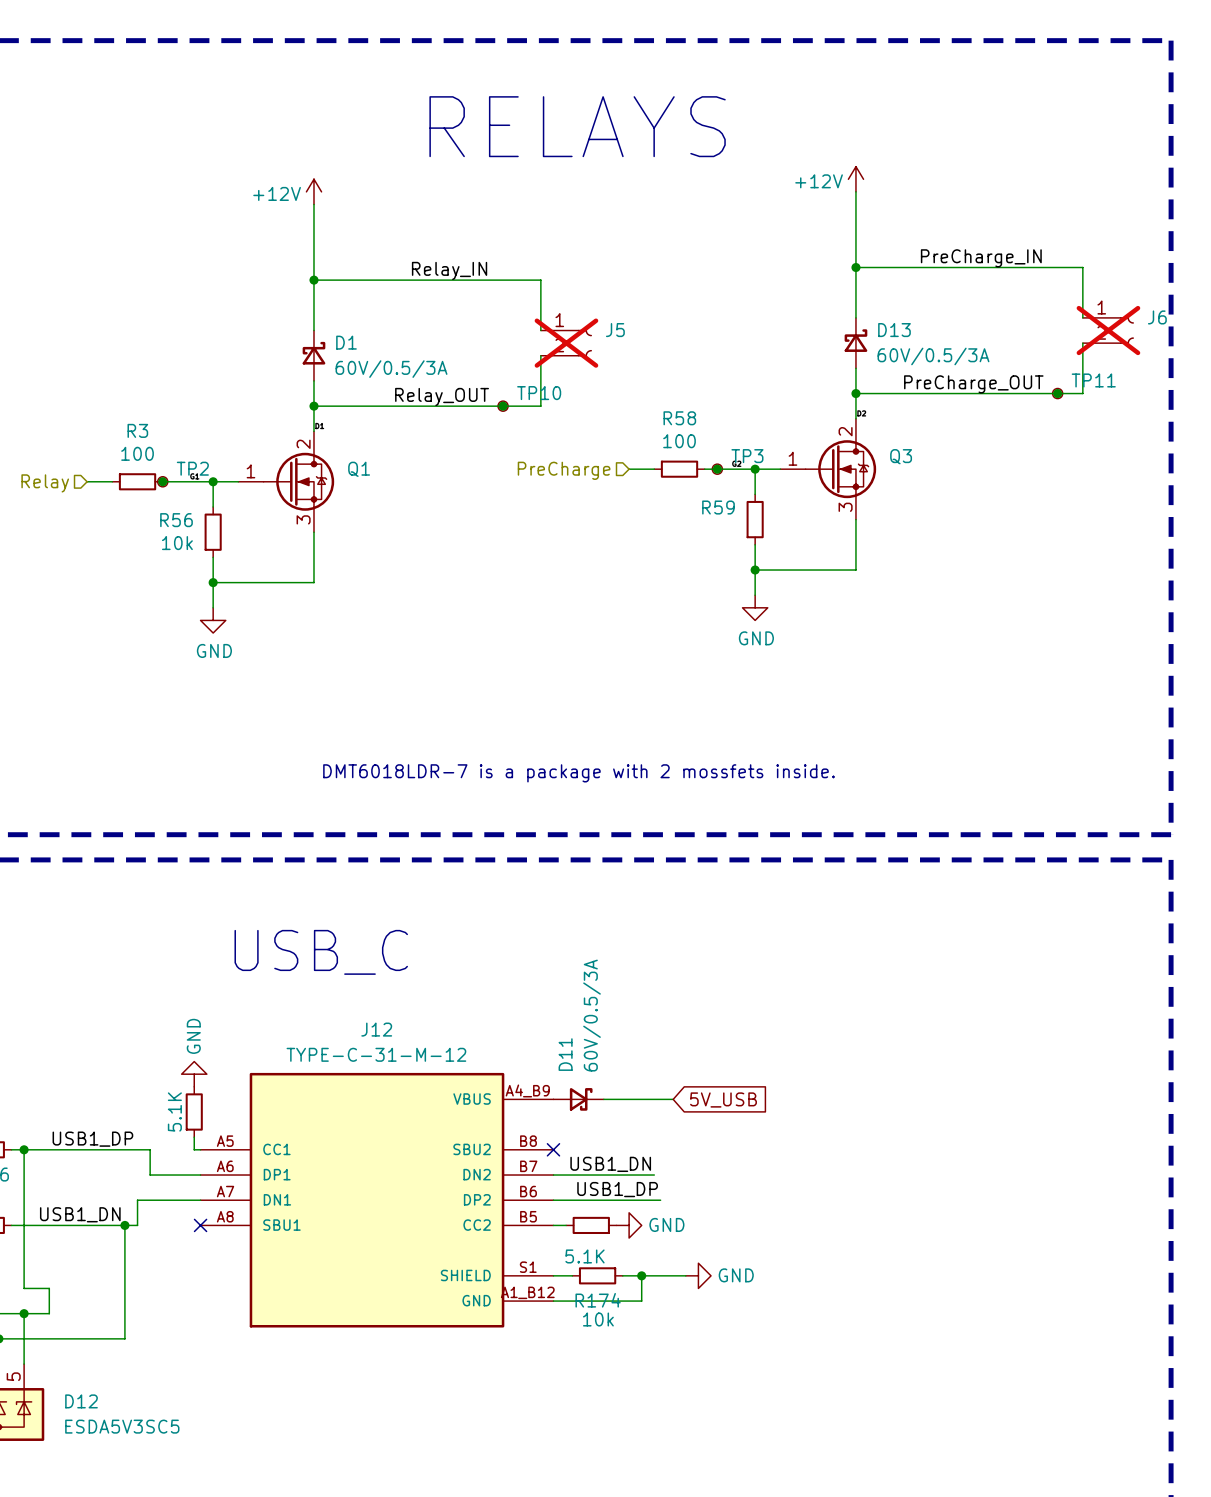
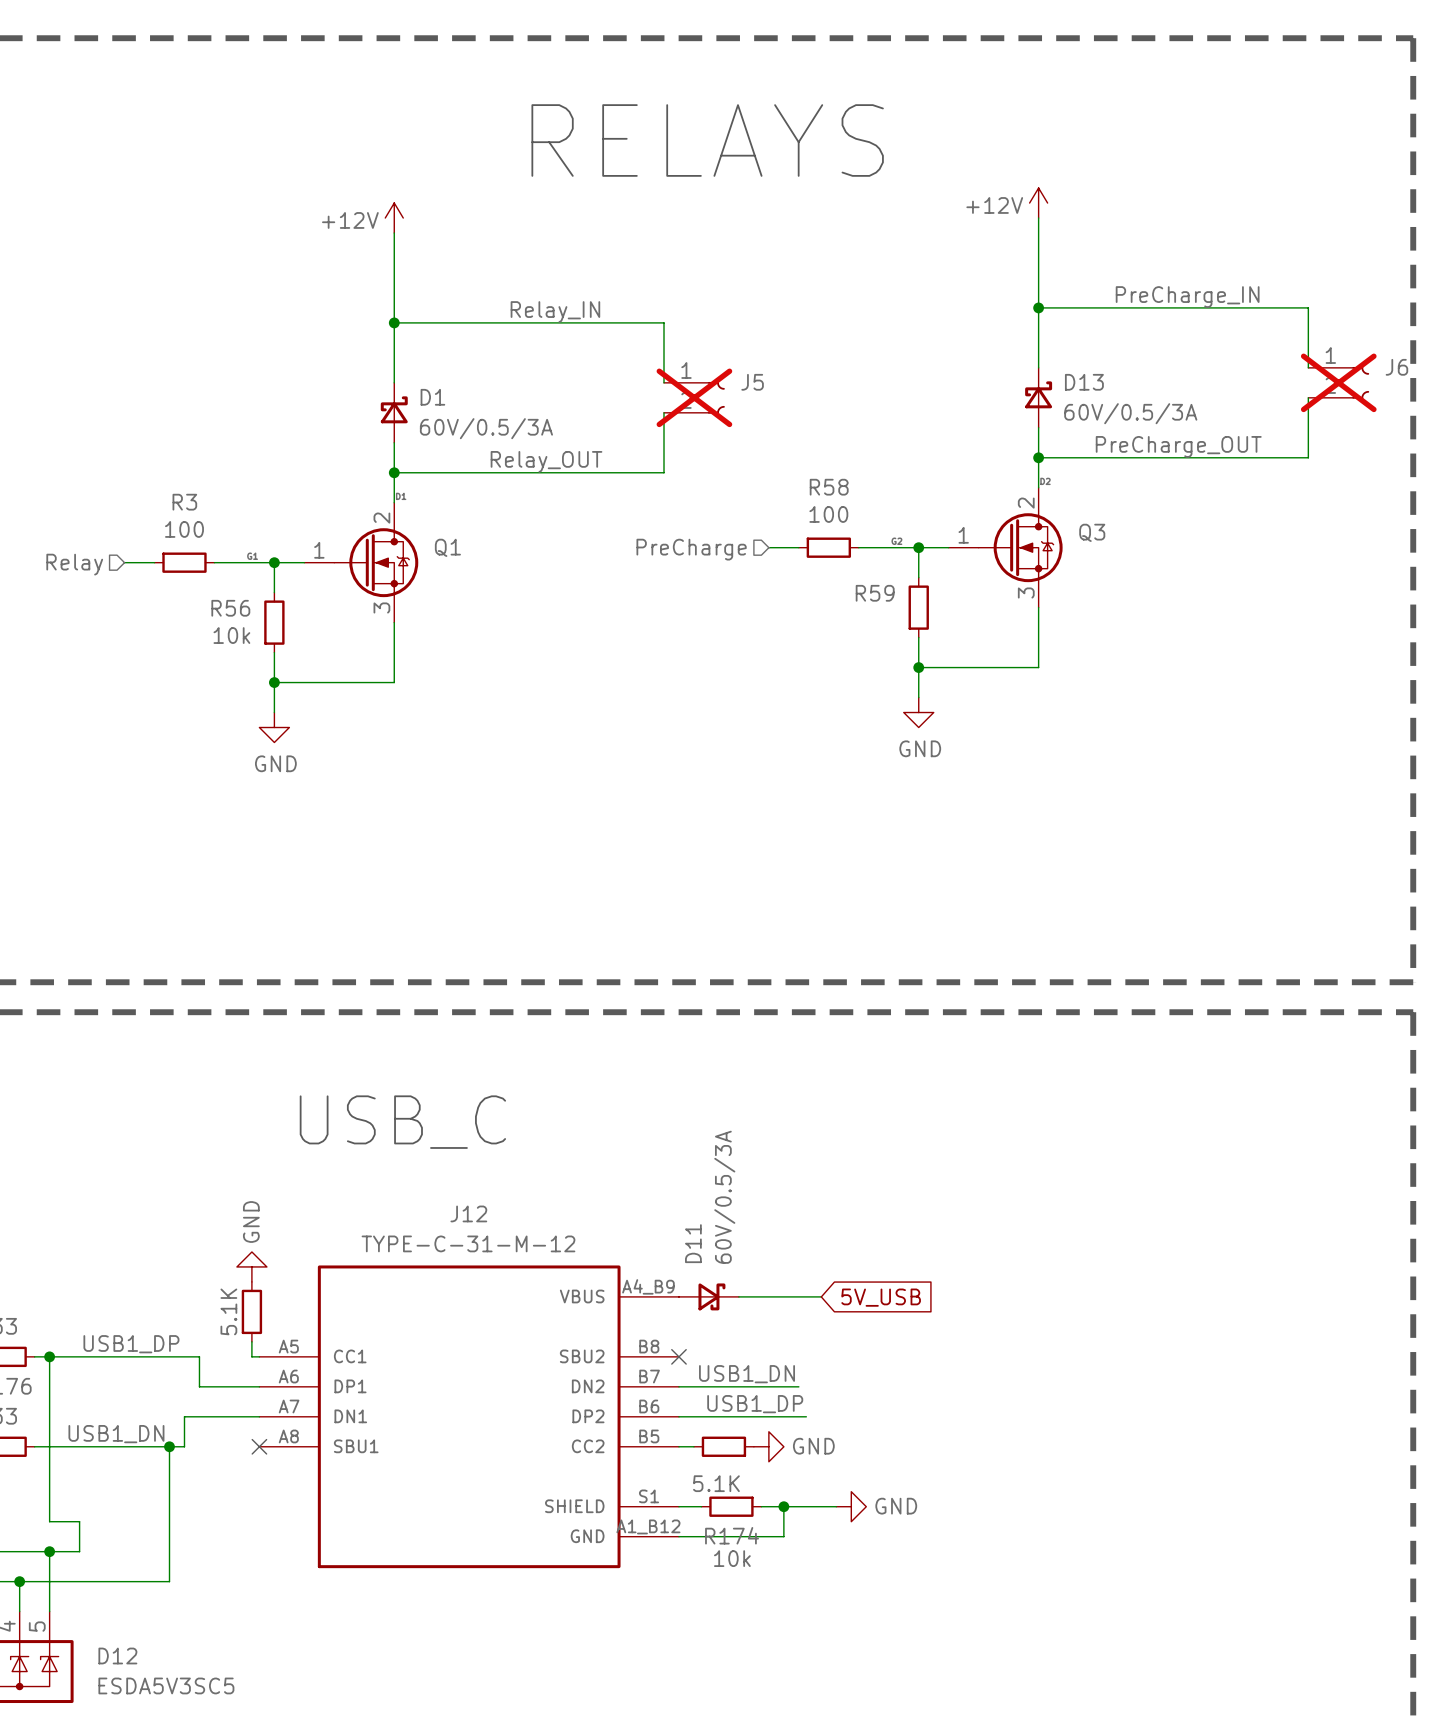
junction: (1057, 393) -> none
TP11: (1057, 393) -> none
junction: (503, 406) -> none
TP10: (503, 406) -> none
junction: (717, 469) -> none
TP3: (717, 469) -> none
junction: (162, 481) -> none
TP2: (162, 481) -> none
text: DMT6018LDR-7 is a package with 2 mossfets inside. (578, 773) -> none

